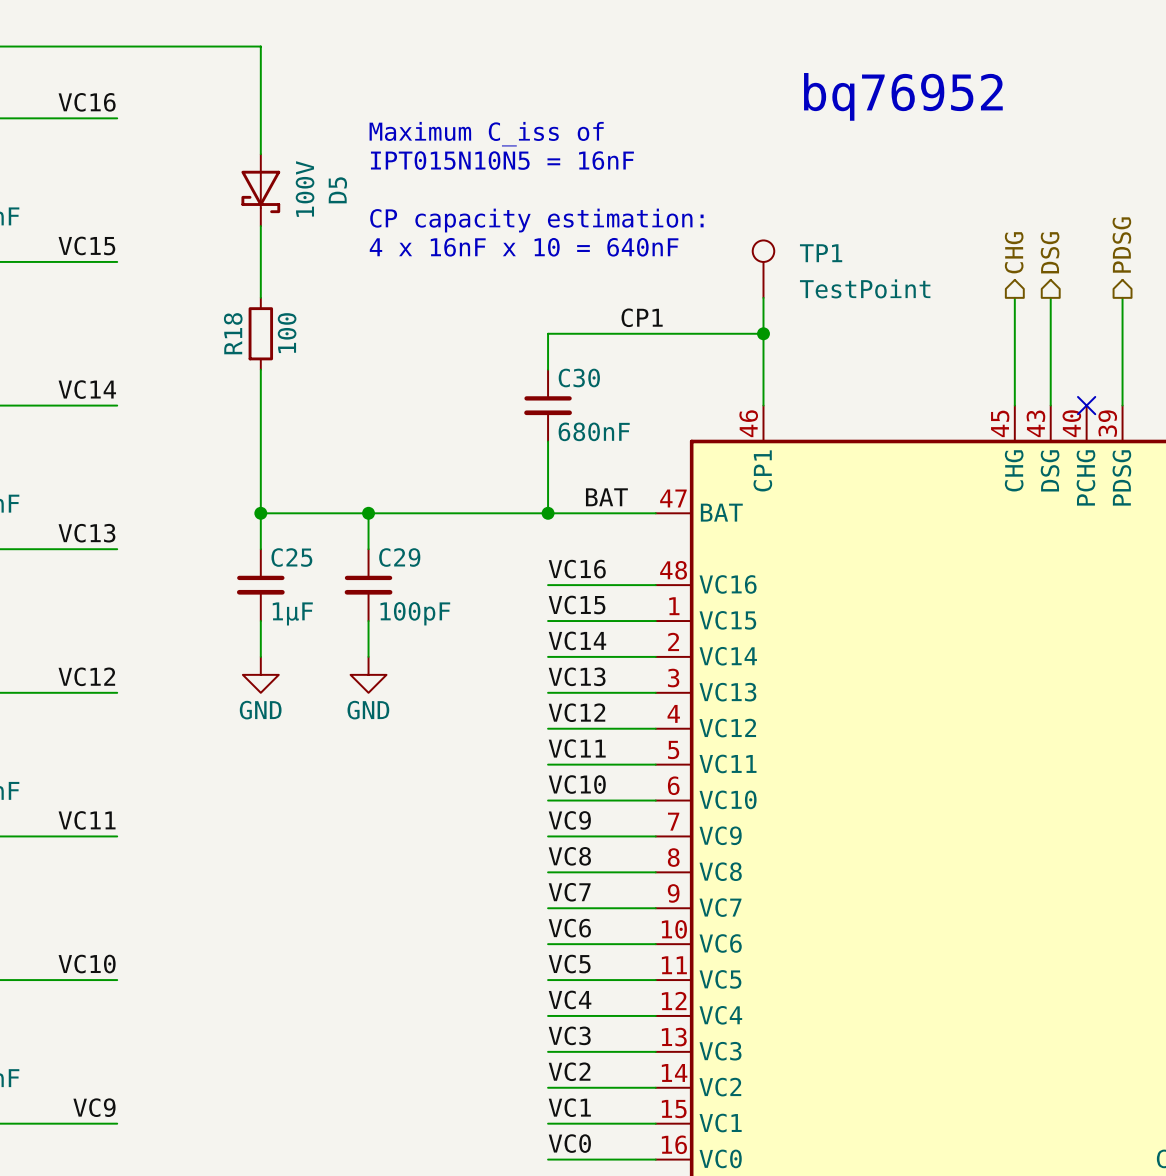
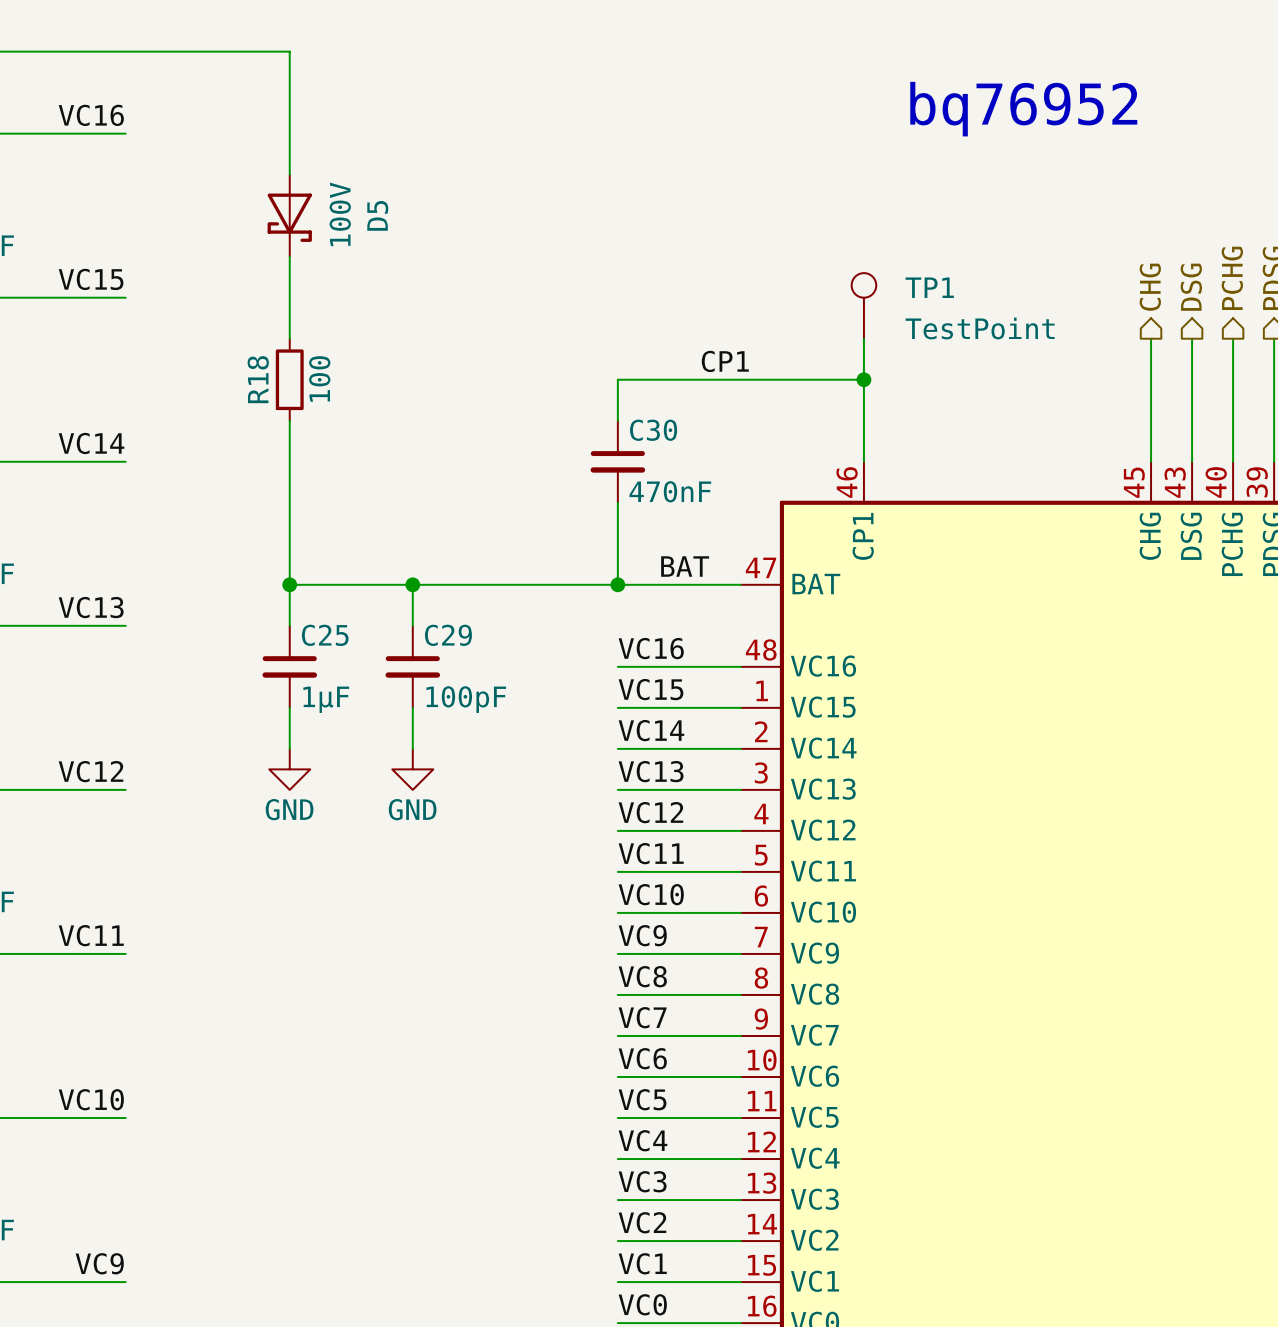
text: Maximum C_iss of (486, 134) -> none
text: IPT015N10N5 = 16nF (502, 160) -> none
text: CP capacity estimation: (536, 220) -> none
hierarchical label: none -> PCHG (1232, 278)
text: 4 x 16nF x 10 = 640nF (524, 247) -> none
wire: none -> (1233, 338) (1233, 461)
no-connect mark: (1086, 405) -> none
C30 value: 680nF (594, 431) -> 470nF (670, 491)

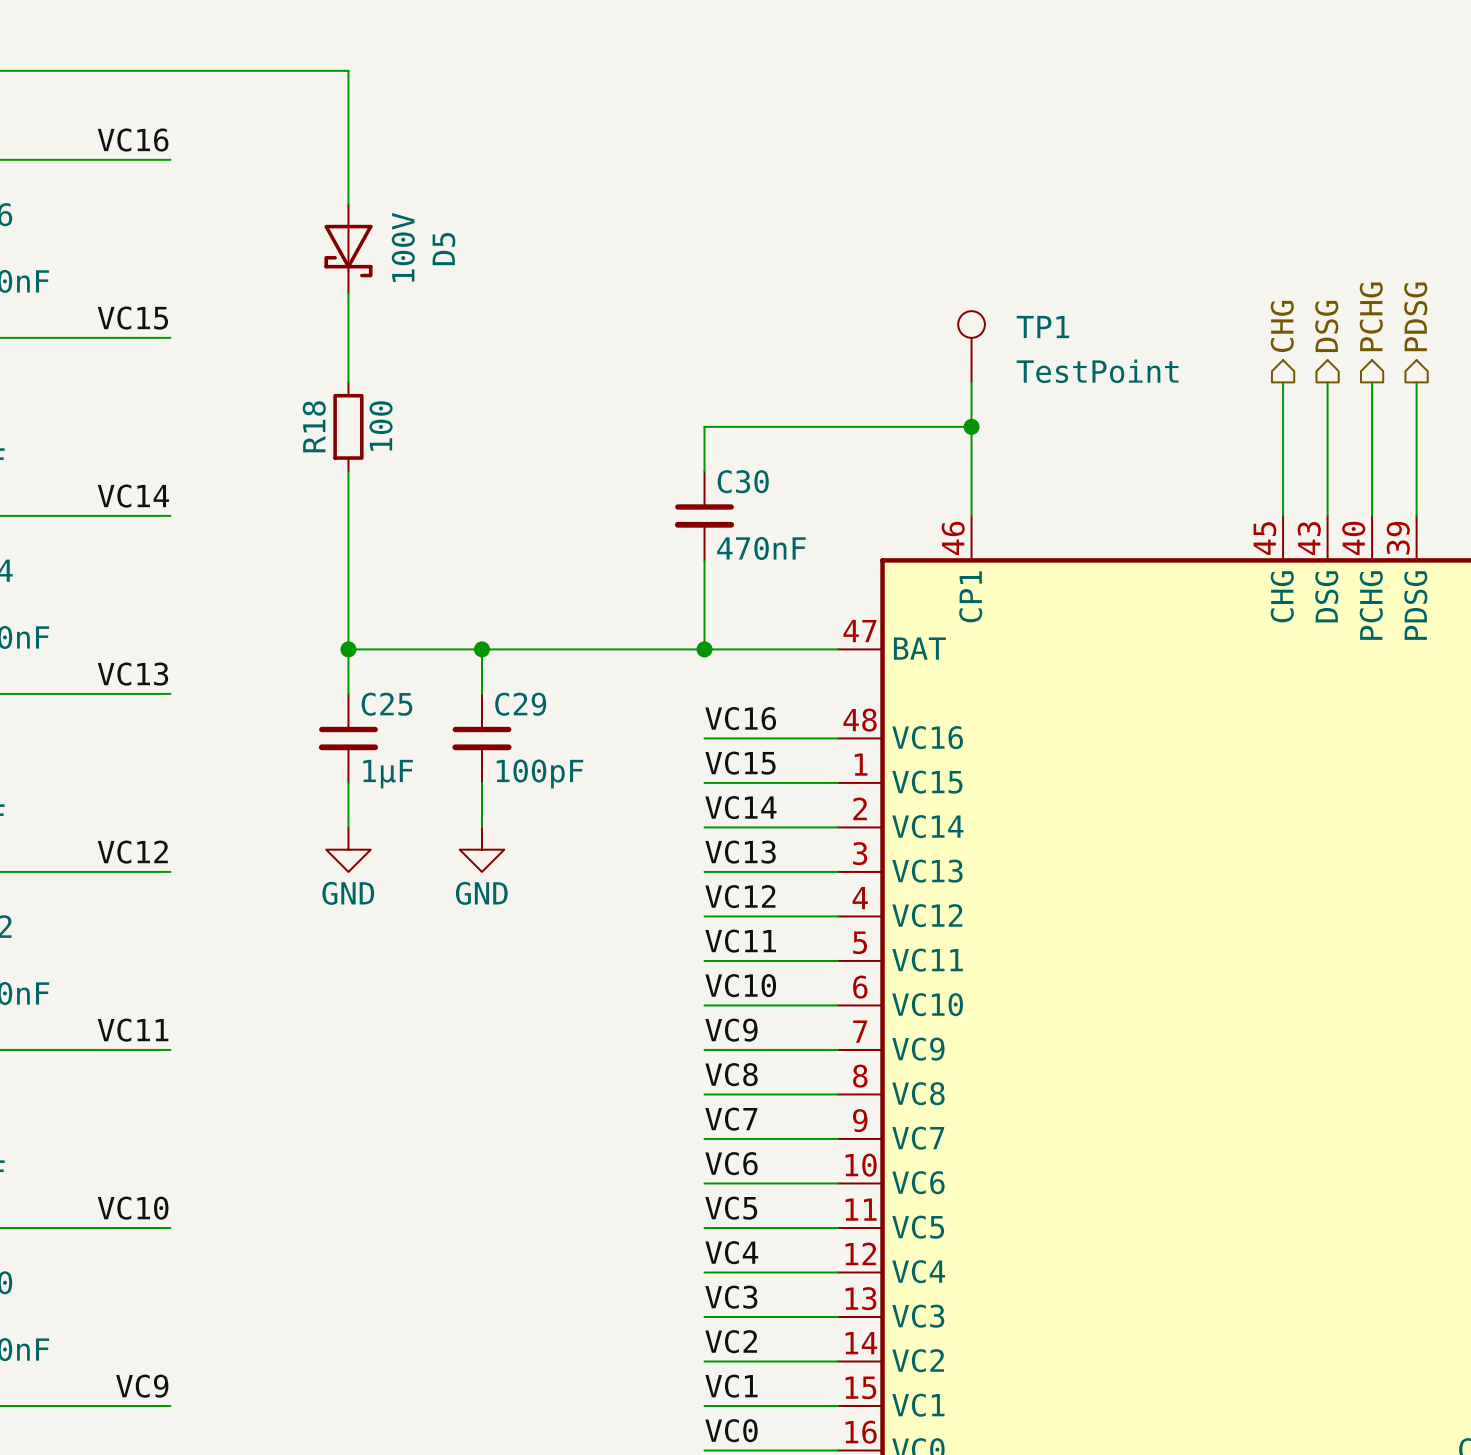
text: bq76952 (1023, 109) -> none
label: CP1 (725, 361) -> none
label: BAT (685, 566) -> none

